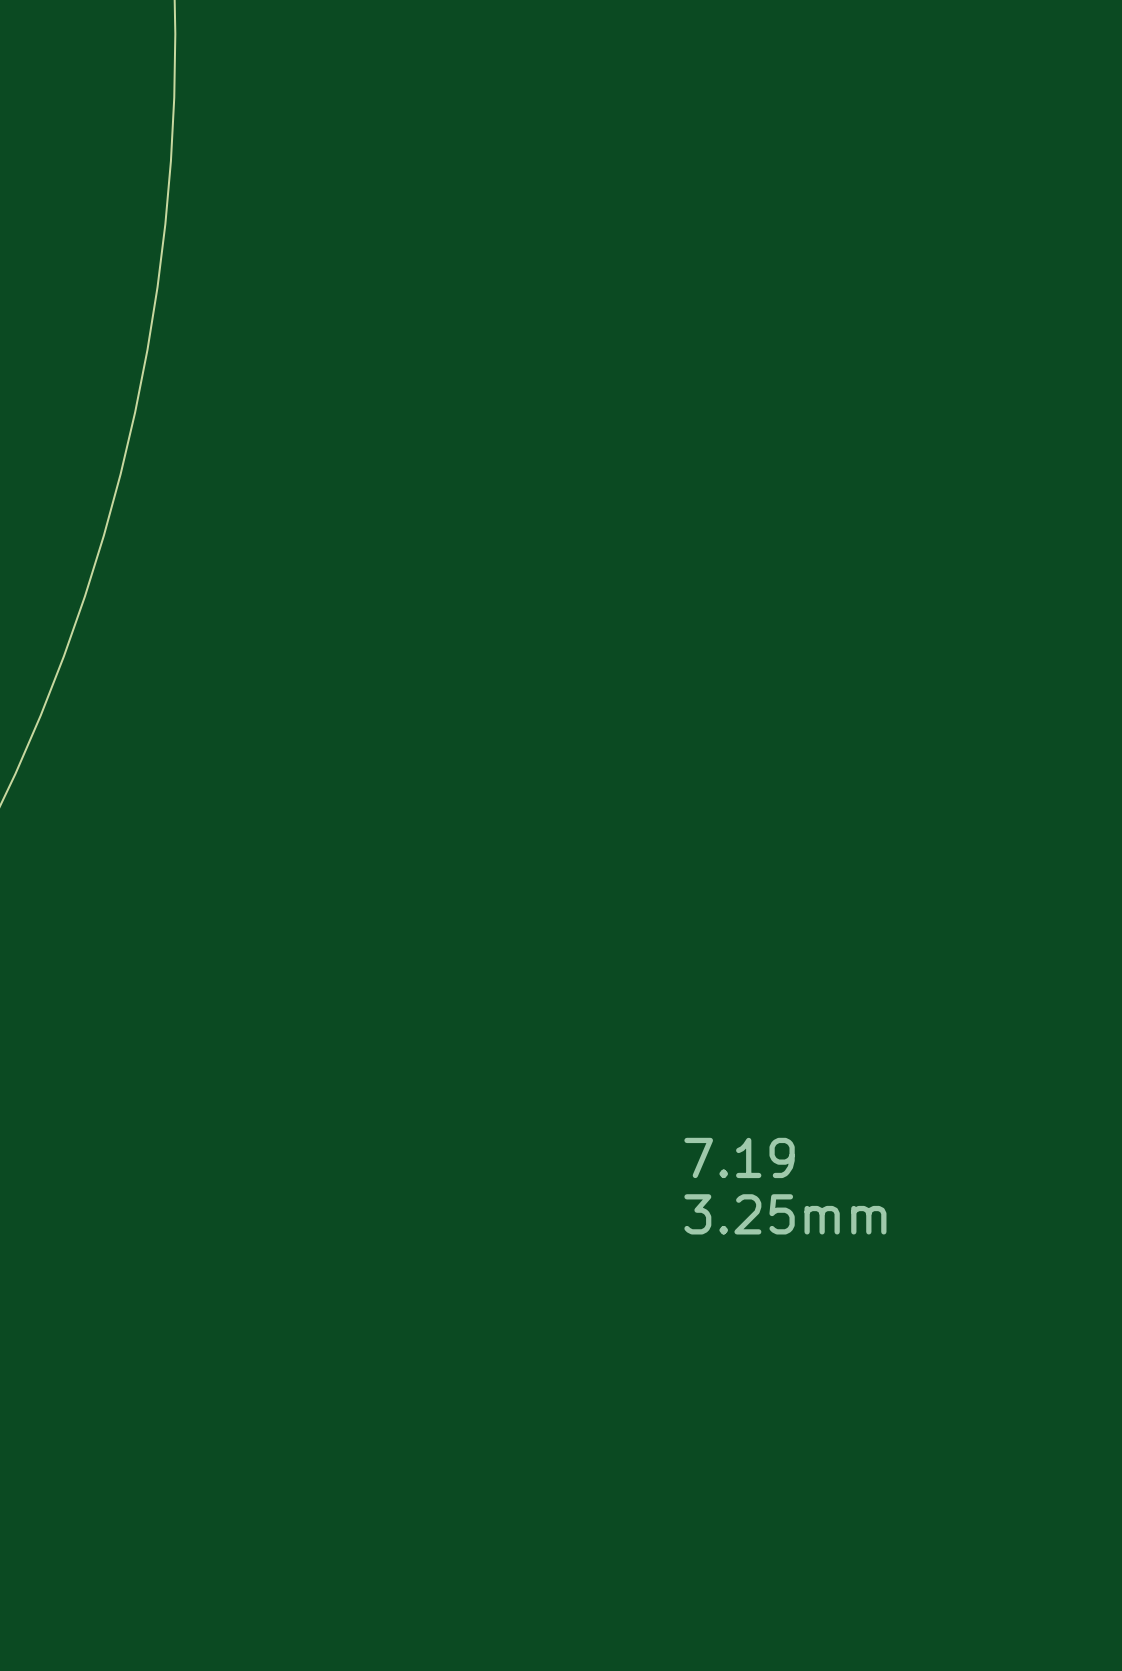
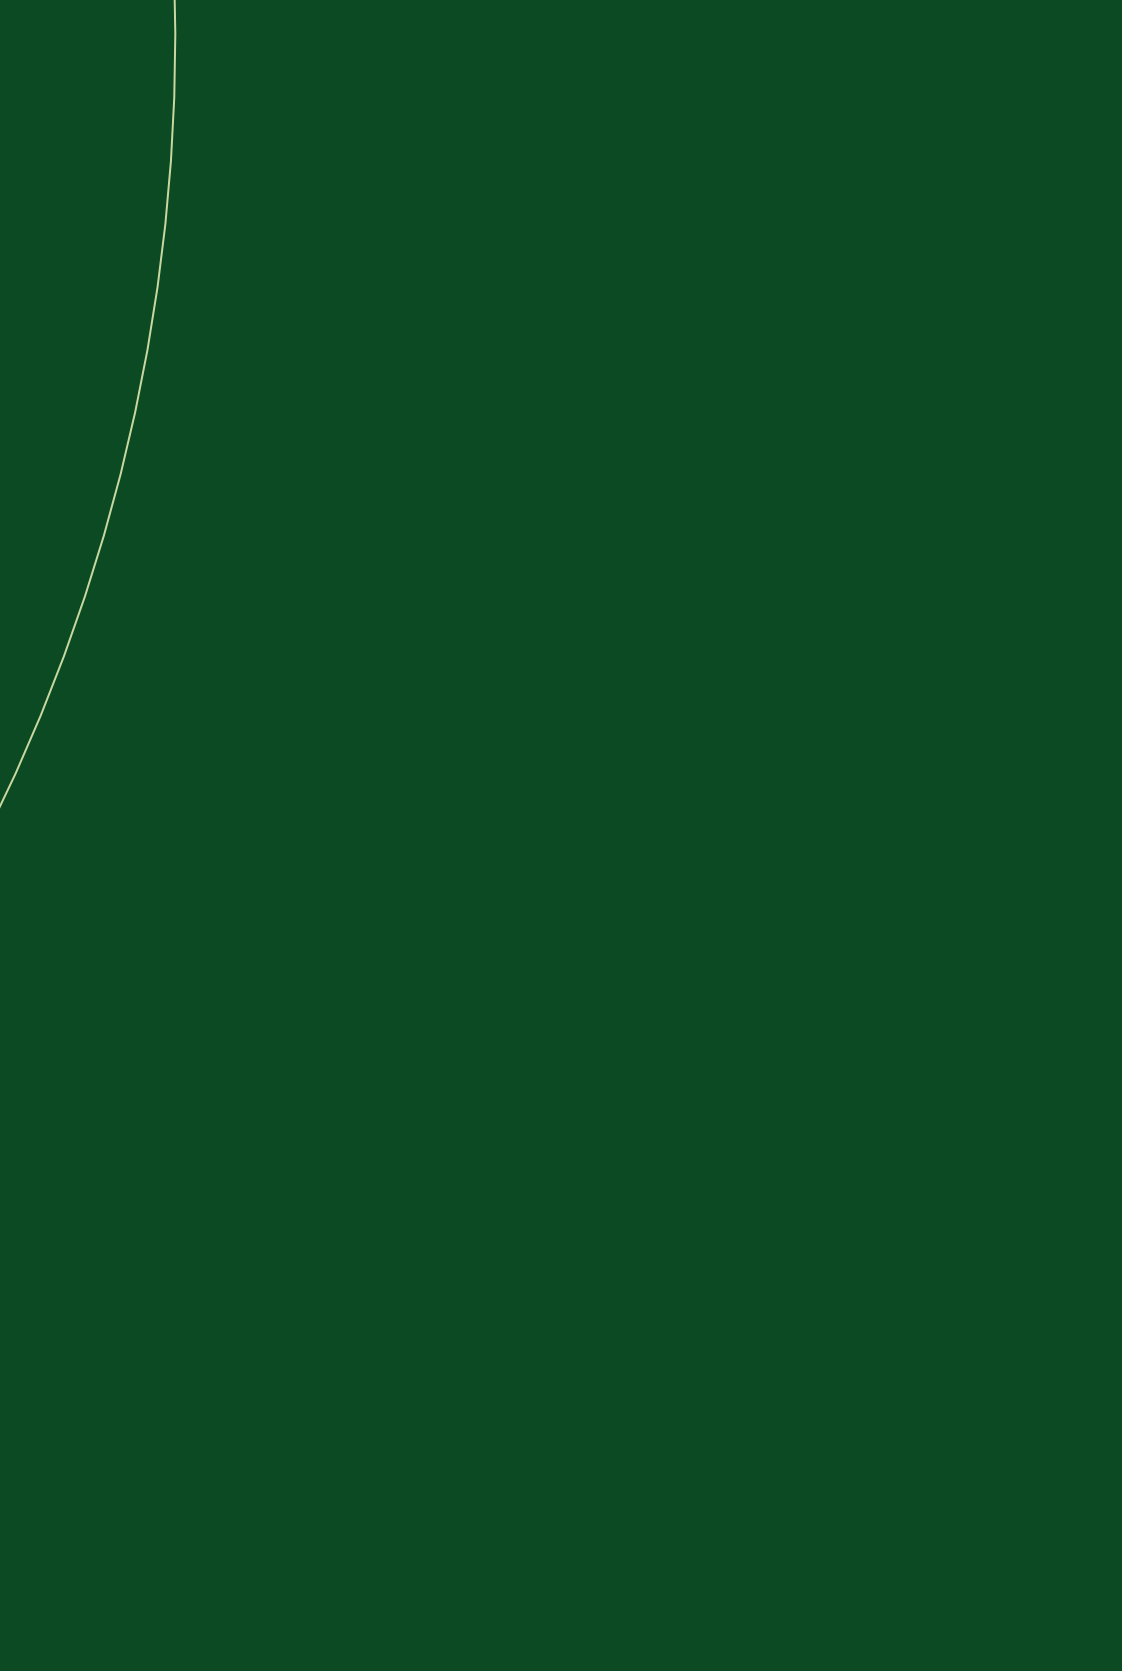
text: 7.19 (739, 1157) -> none
text: 3.25mm (785, 1214) -> none

